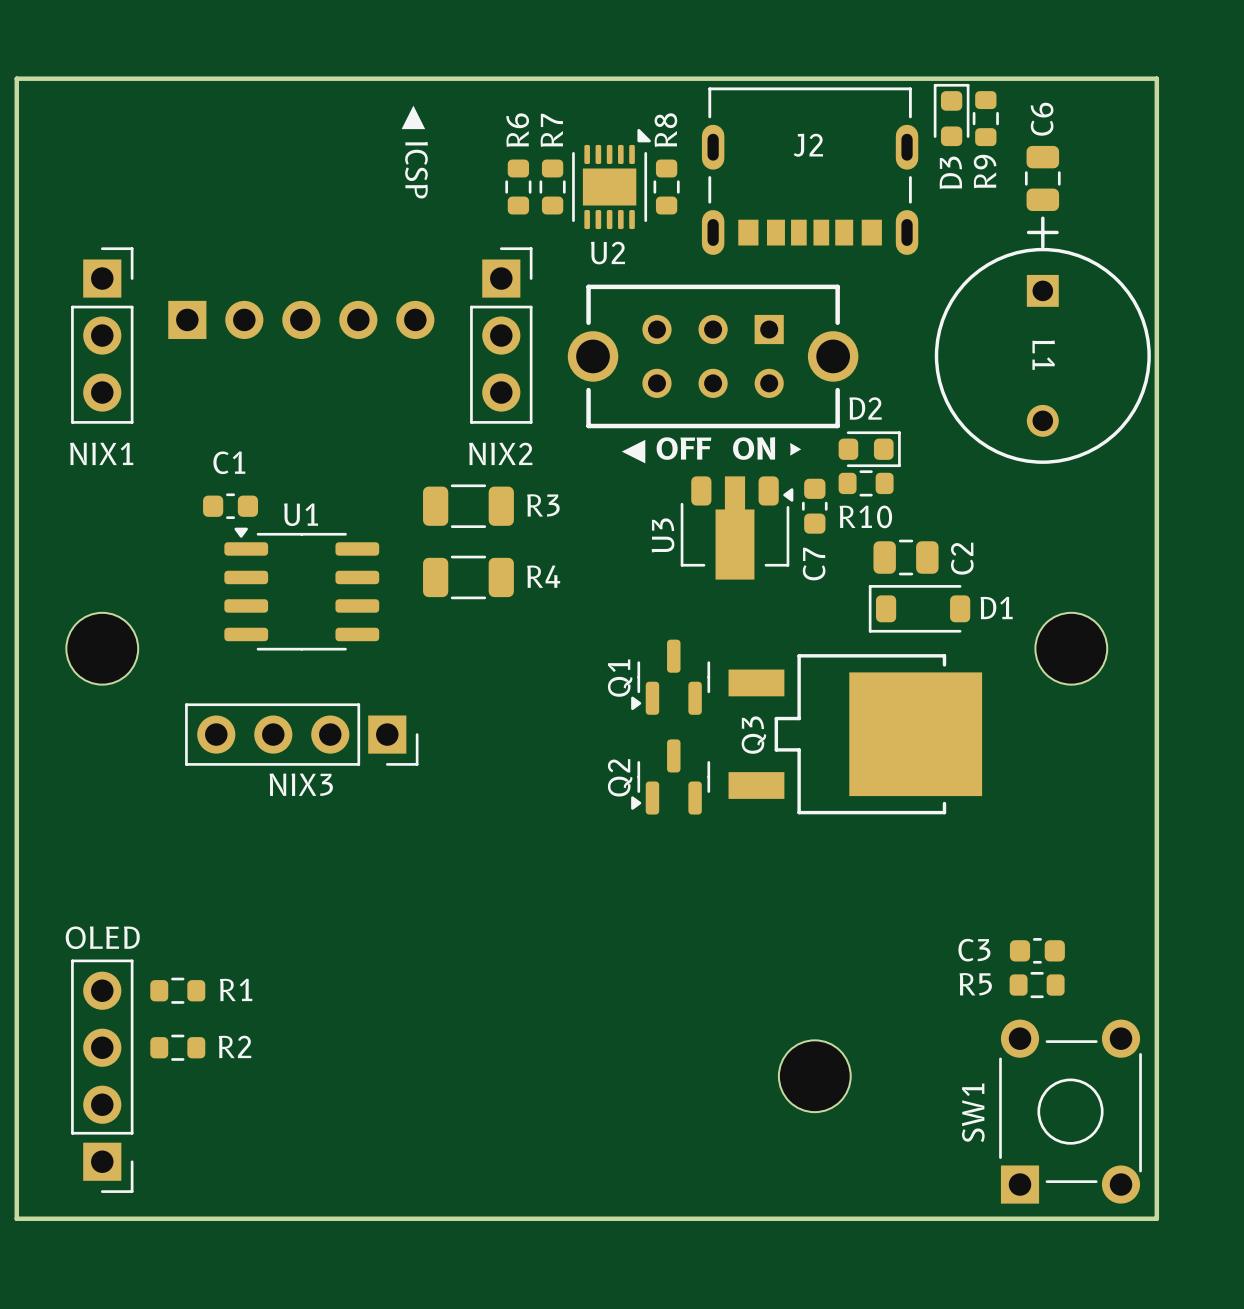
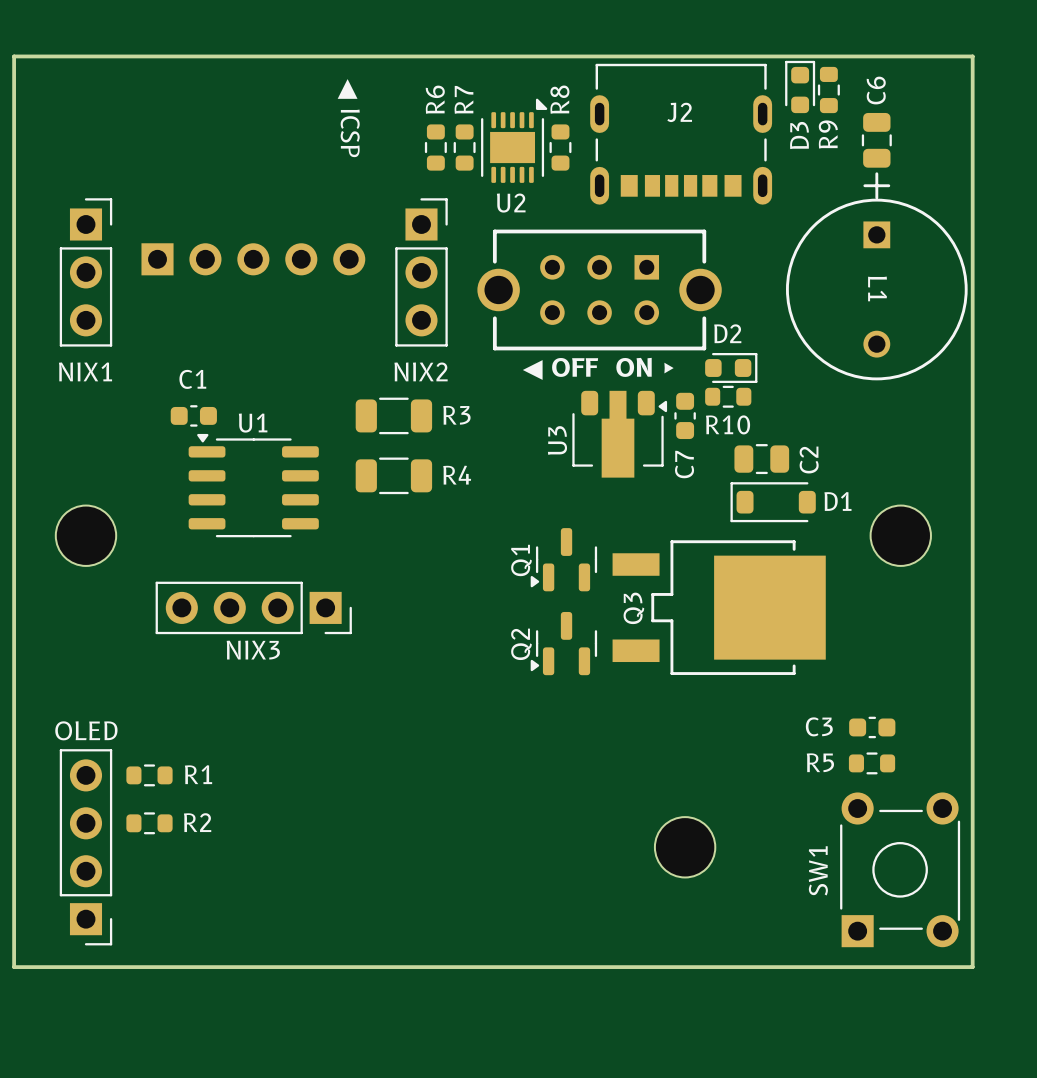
R1: none -> (149, 775)
C3 position: (1037, 950) -> (872, 727)
R5 position: (1037, 985) -> (872, 763)
R1 name: R1 (236, 989) -> R2 (197, 822)
R2: (177, 1047) -> none
part position: (102, 1076) -> (85, 847)
part position: (814, 1076) -> (685, 847)
SW1 position: (1070, 1111) -> (900, 869)
board edge: (16, 1161) (16, 1218) (1156, 1218) (1156, 1161) -> (14, 967) (972, 967)

